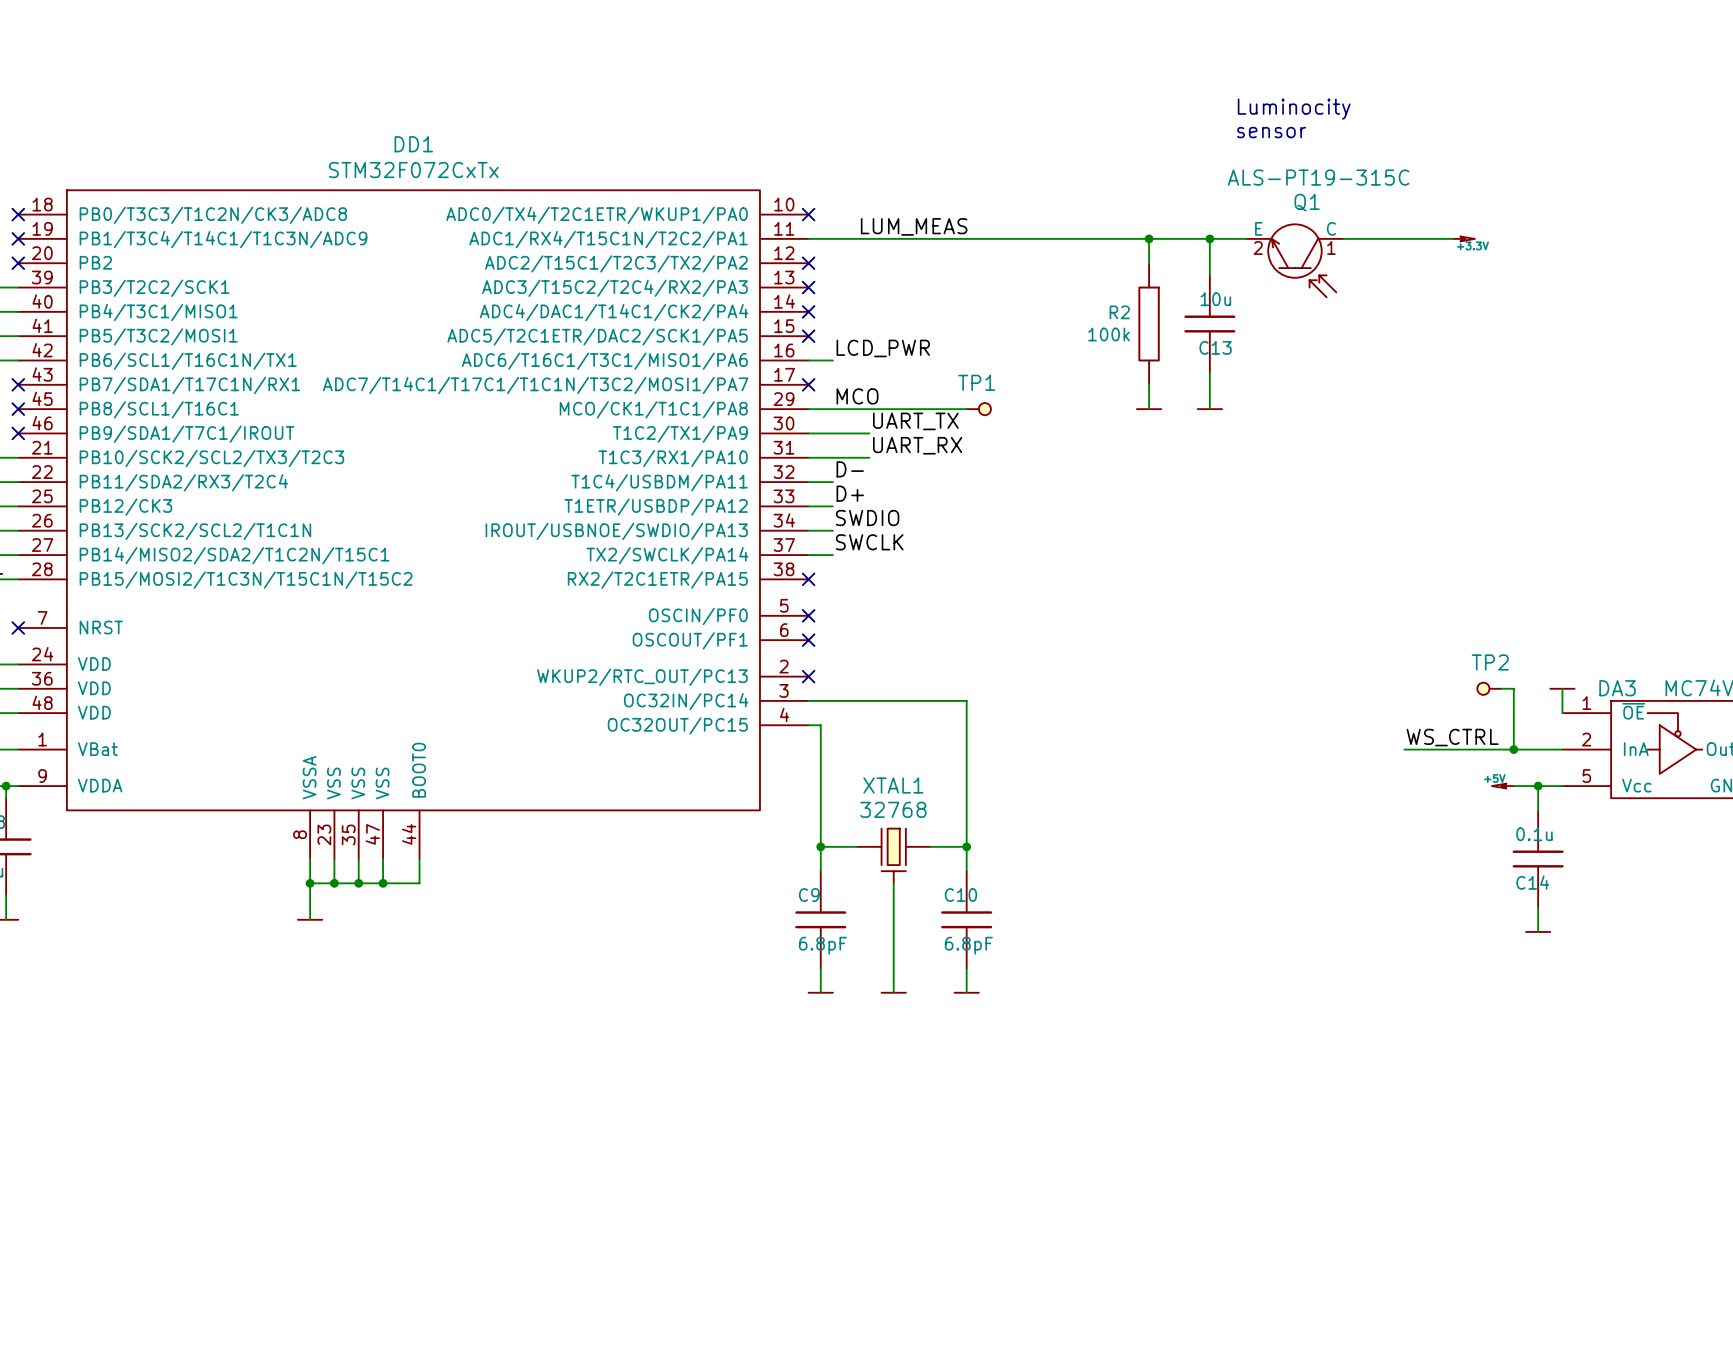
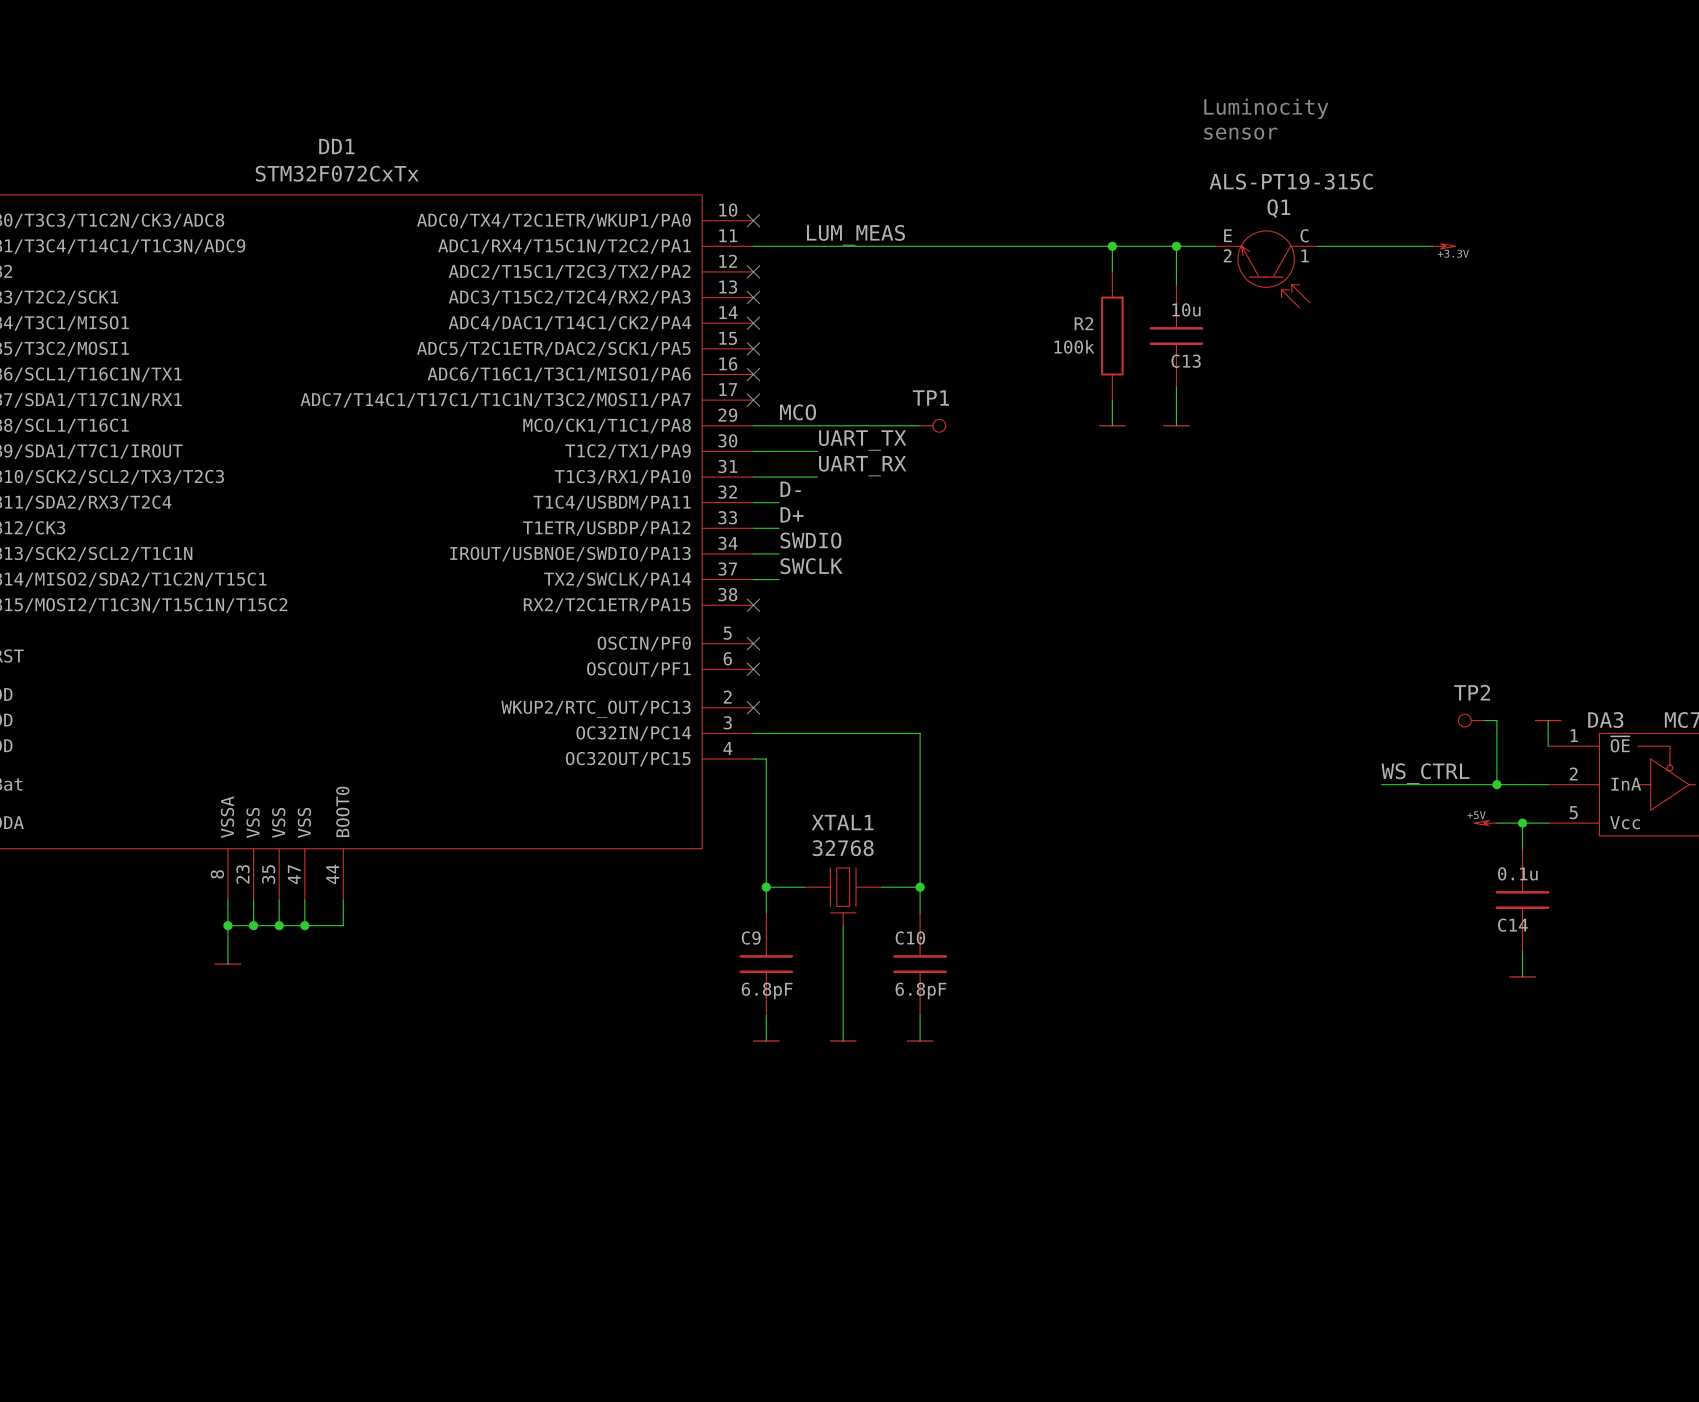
label: LCD_PWR (883, 348) -> none
wire: (808, 360) (832, 360) -> none
no-connect mark: none -> (753, 374)

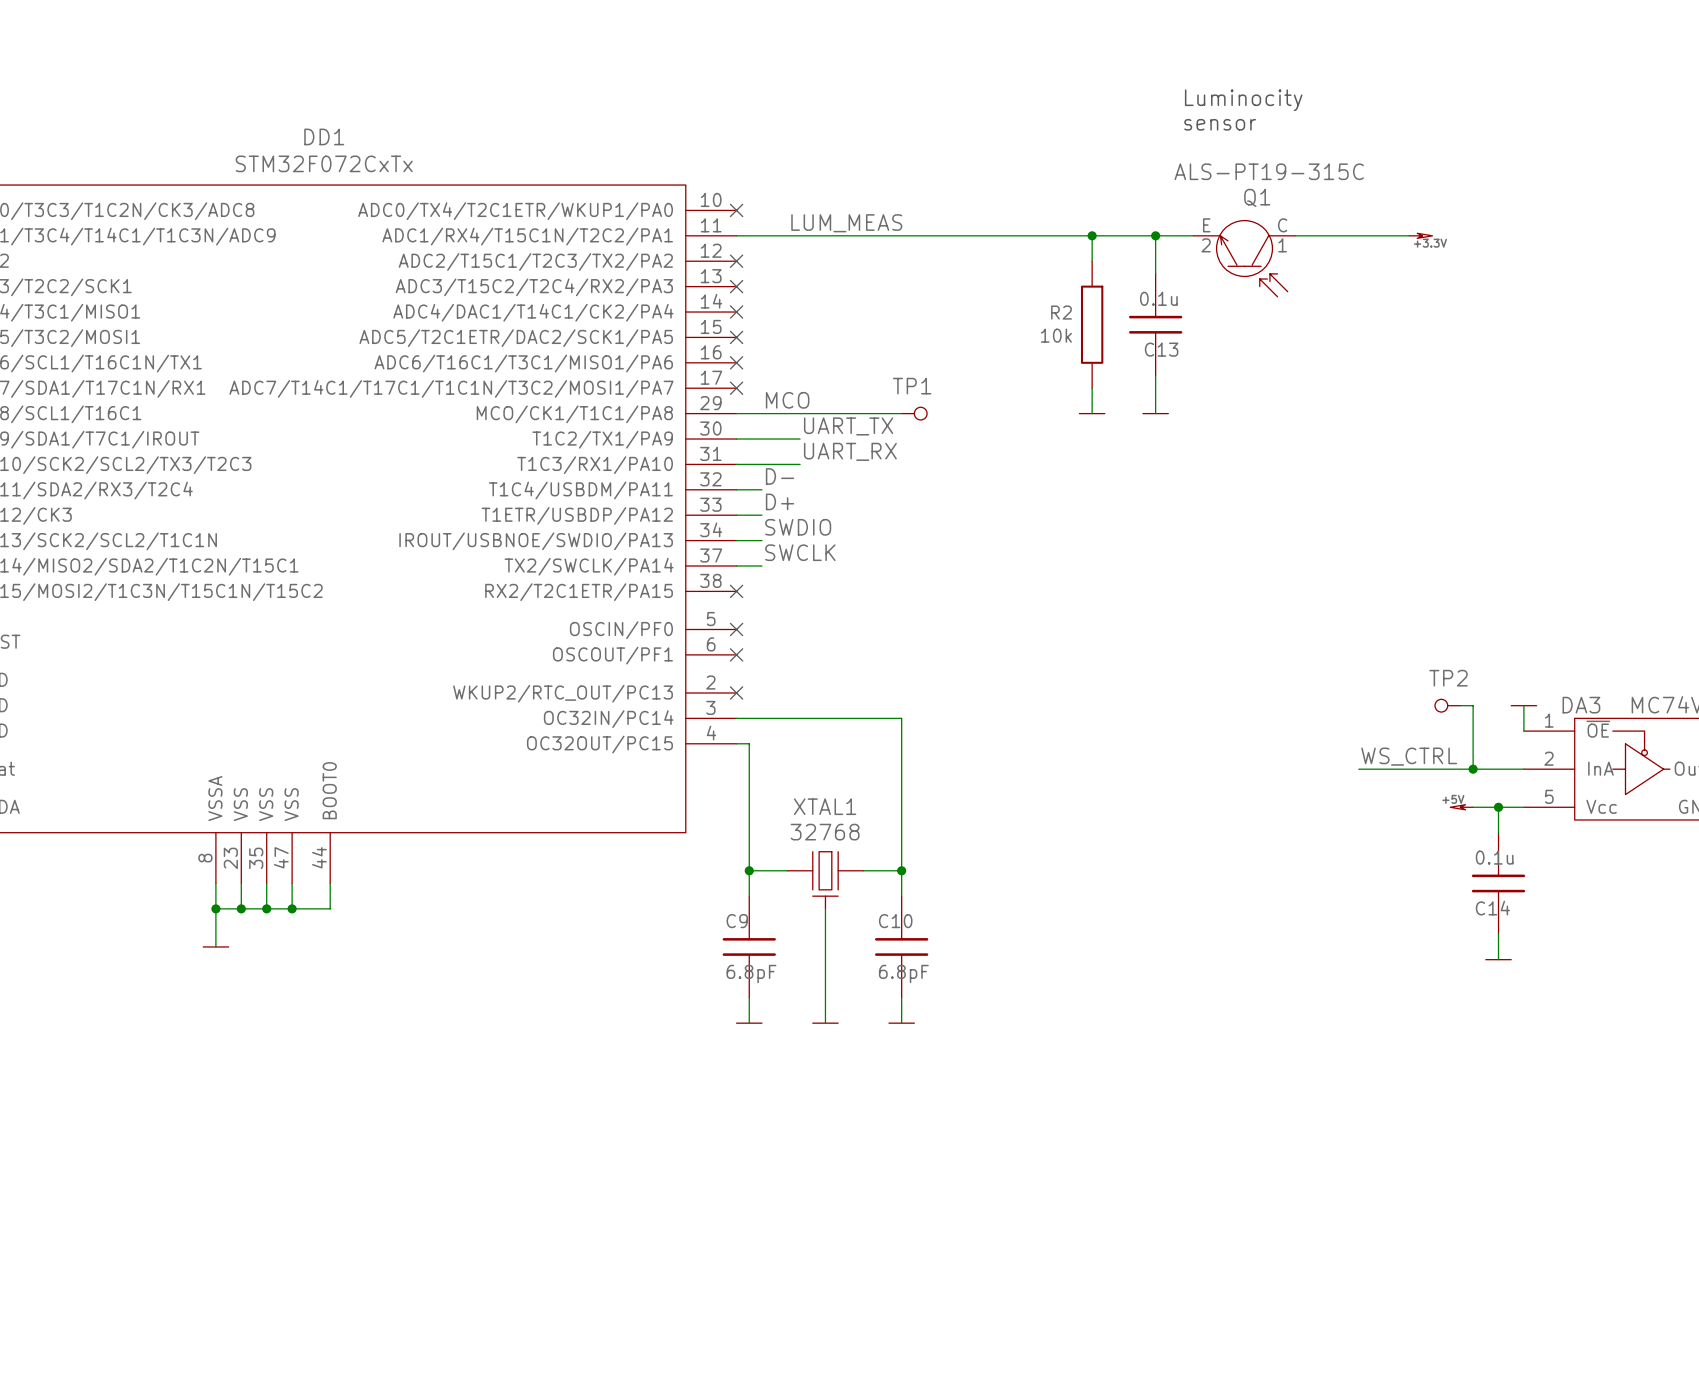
C13 value: 10u (1186, 309) -> 0.1u (1158, 298)
R2 value: 100k (1074, 346) -> 10k (1056, 335)

